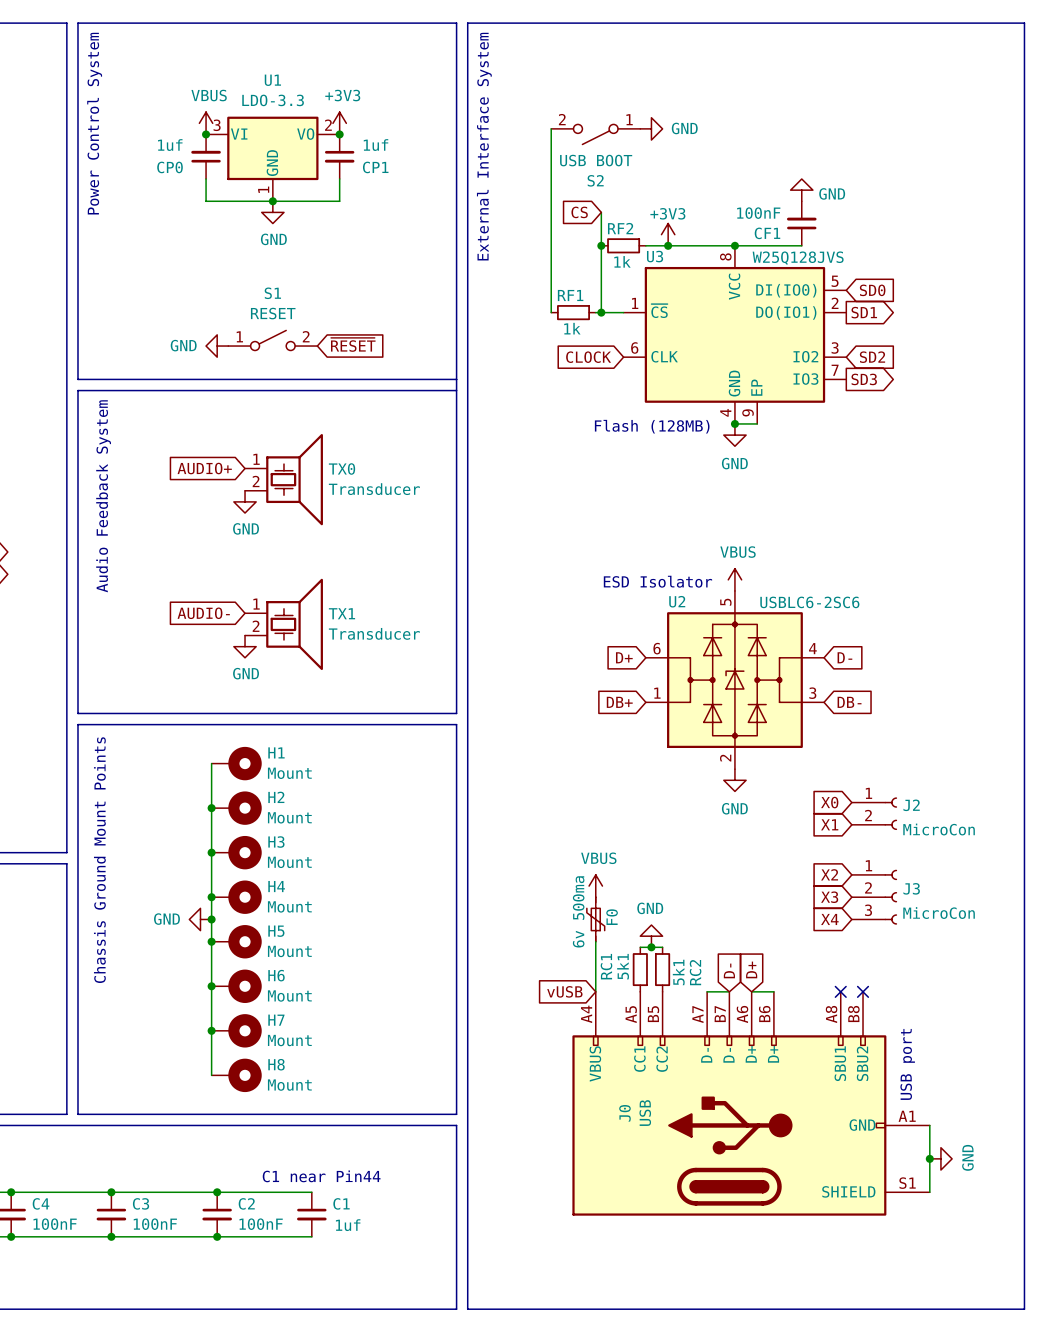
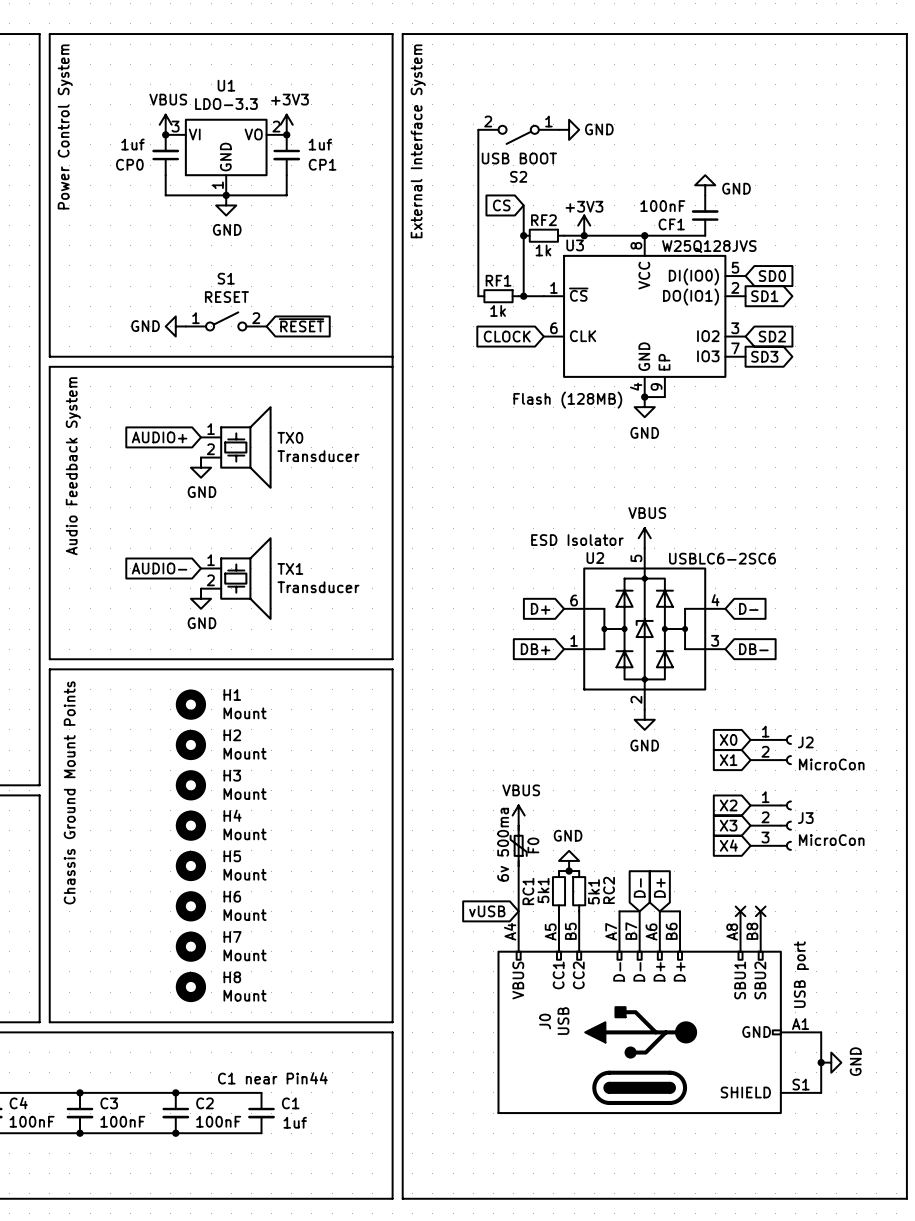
H1 symbol: [211, 746, 262, 781] -> [175, 689, 207, 720]
wire: (211, 763) (211, 1075) -> none
H2 symbol: [211, 791, 262, 825] -> [175, 729, 207, 761]
junction: (211, 808) -> none
H3 symbol: [211, 835, 262, 870] -> [175, 770, 207, 801]
junction: (211, 852) -> none
H4 symbol: [211, 880, 262, 914] -> [175, 810, 207, 841]
junction: (211, 897) -> none
power symbol: GND (200, 919) -> none
junction: (211, 919) -> none
H5 symbol: [211, 925, 262, 959] -> [175, 850, 207, 882]
junction: (211, 941) -> none
H6 symbol: [211, 969, 262, 1003] -> [175, 891, 207, 922]
junction: (211, 986) -> none
H7 symbol: [211, 1014, 262, 1048] -> [175, 931, 207, 962]
junction: (211, 1030) -> none
H8 symbol: [211, 1058, 262, 1093] -> [175, 971, 207, 1003]

